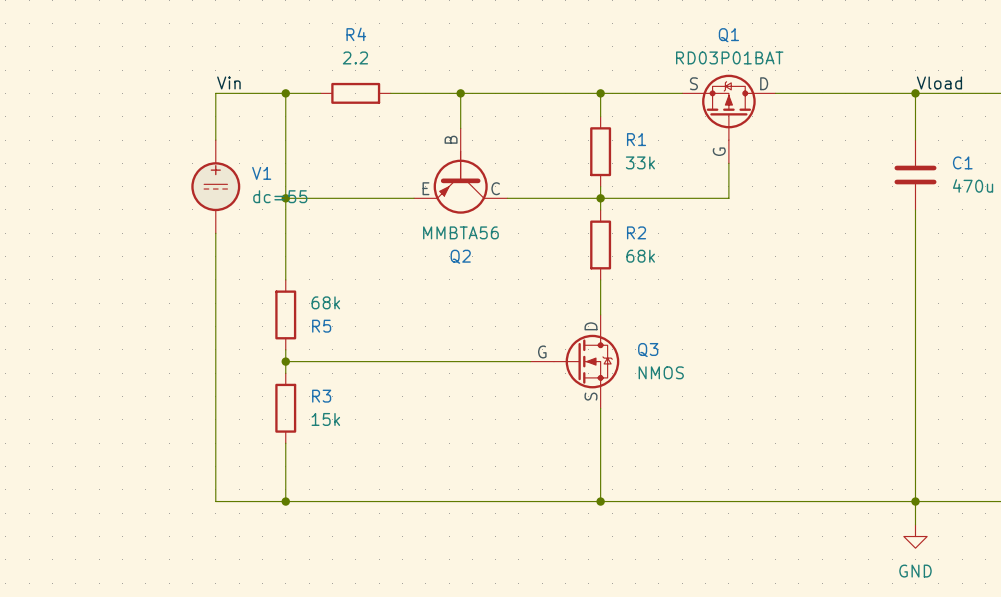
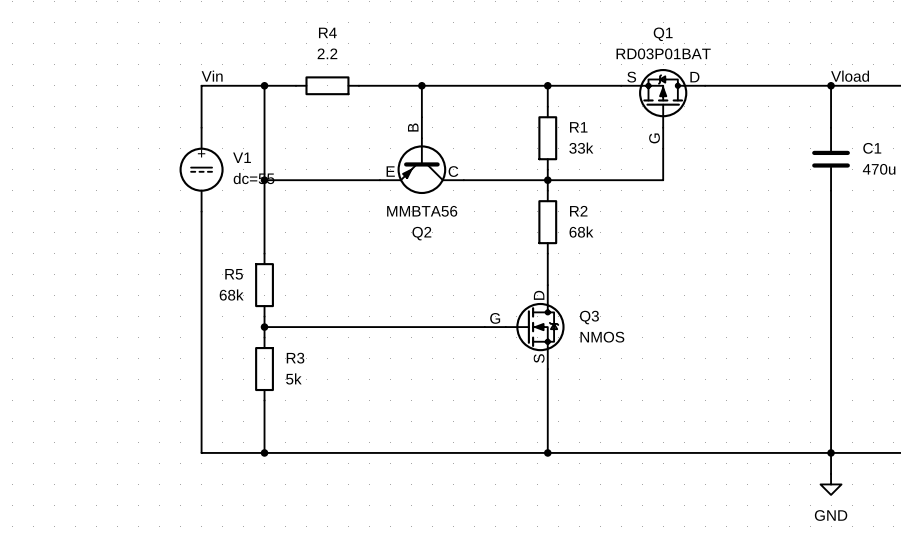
R5 value position: 68k (325, 302) -> 68k (231, 295)
R5 name position: R5 (321, 326) -> R5 (234, 274)
R3 value: 15k (325, 419) -> 5k (293, 378)

